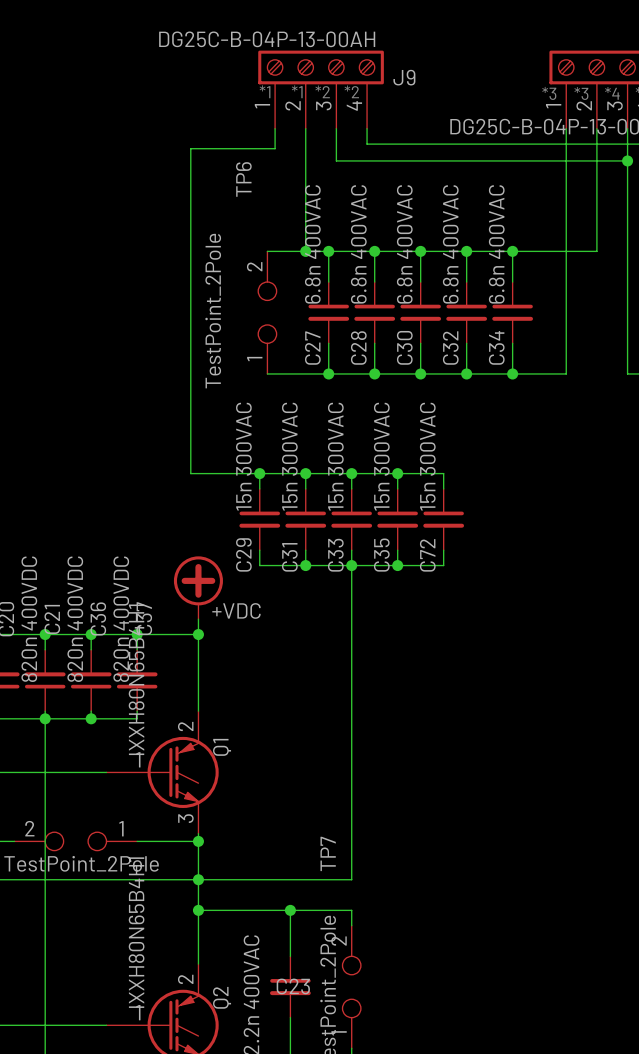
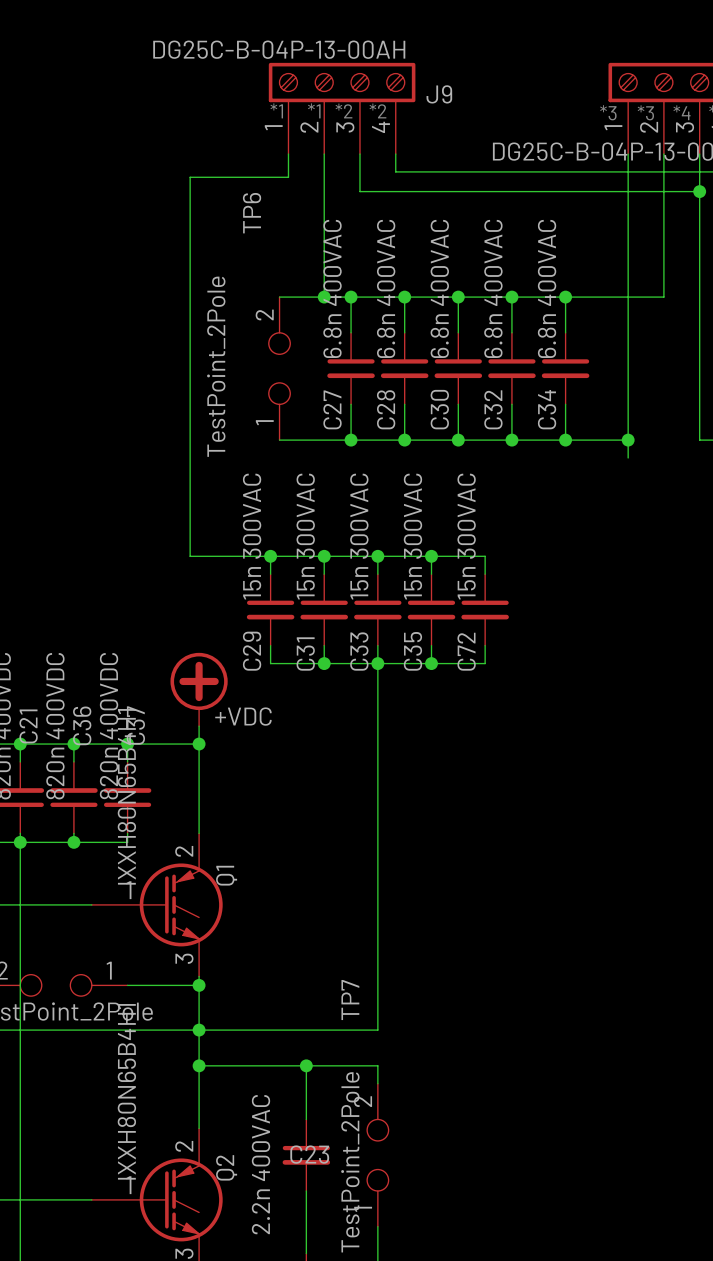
wire: none -> (628, 440) (628, 457)
junction: none -> (628, 440)

